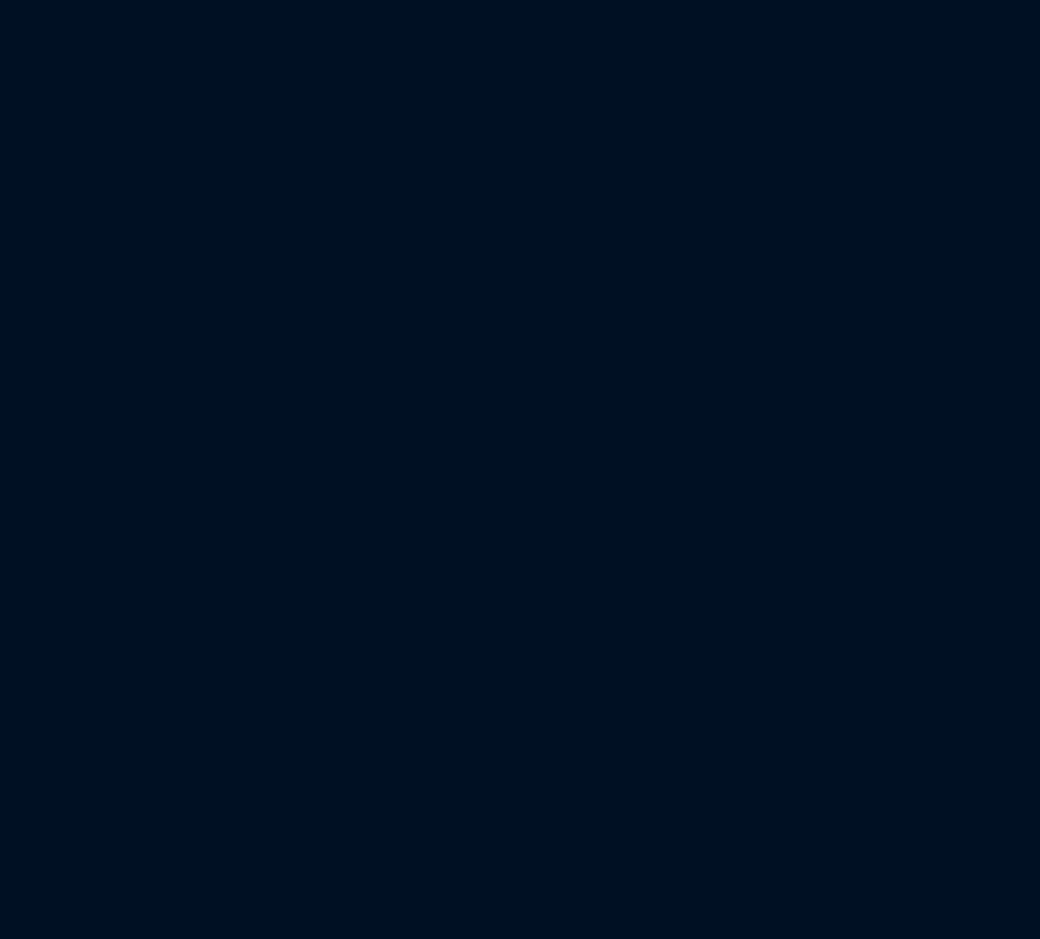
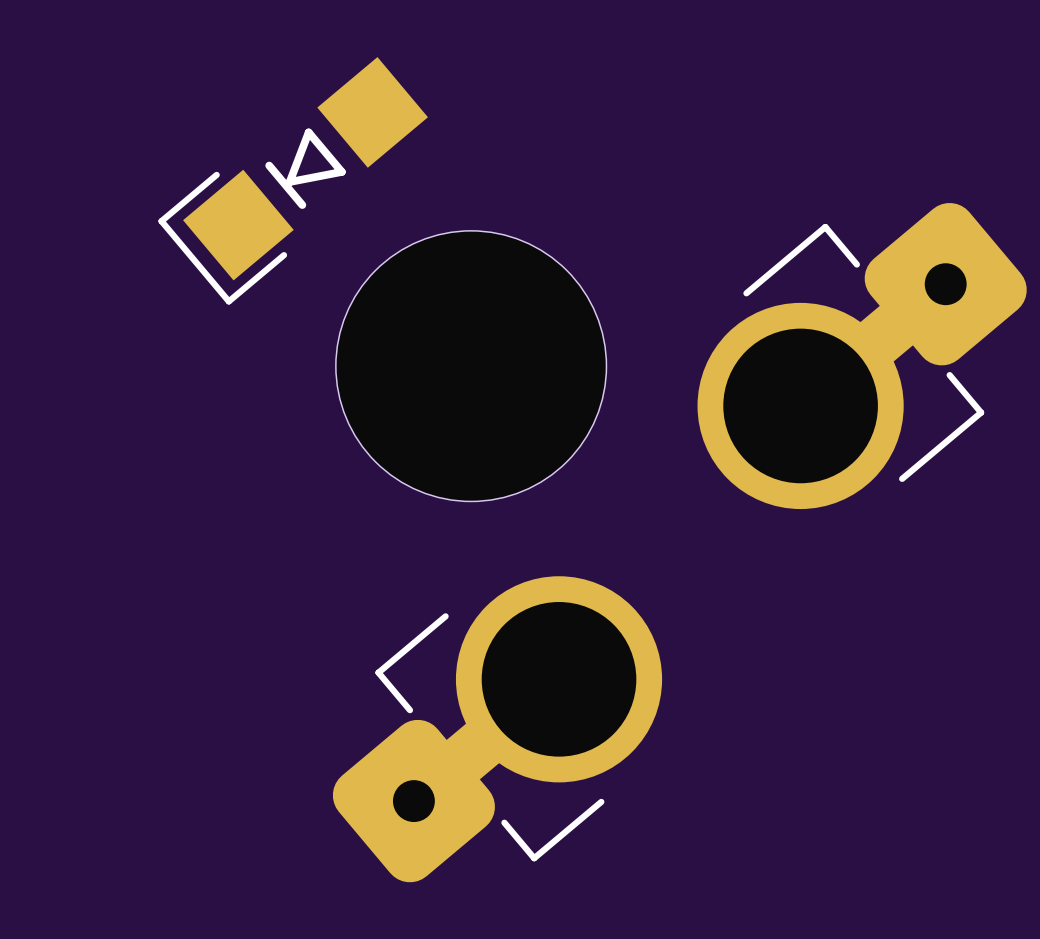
part: none -> (293, 180)
part: none -> (679, 542)

